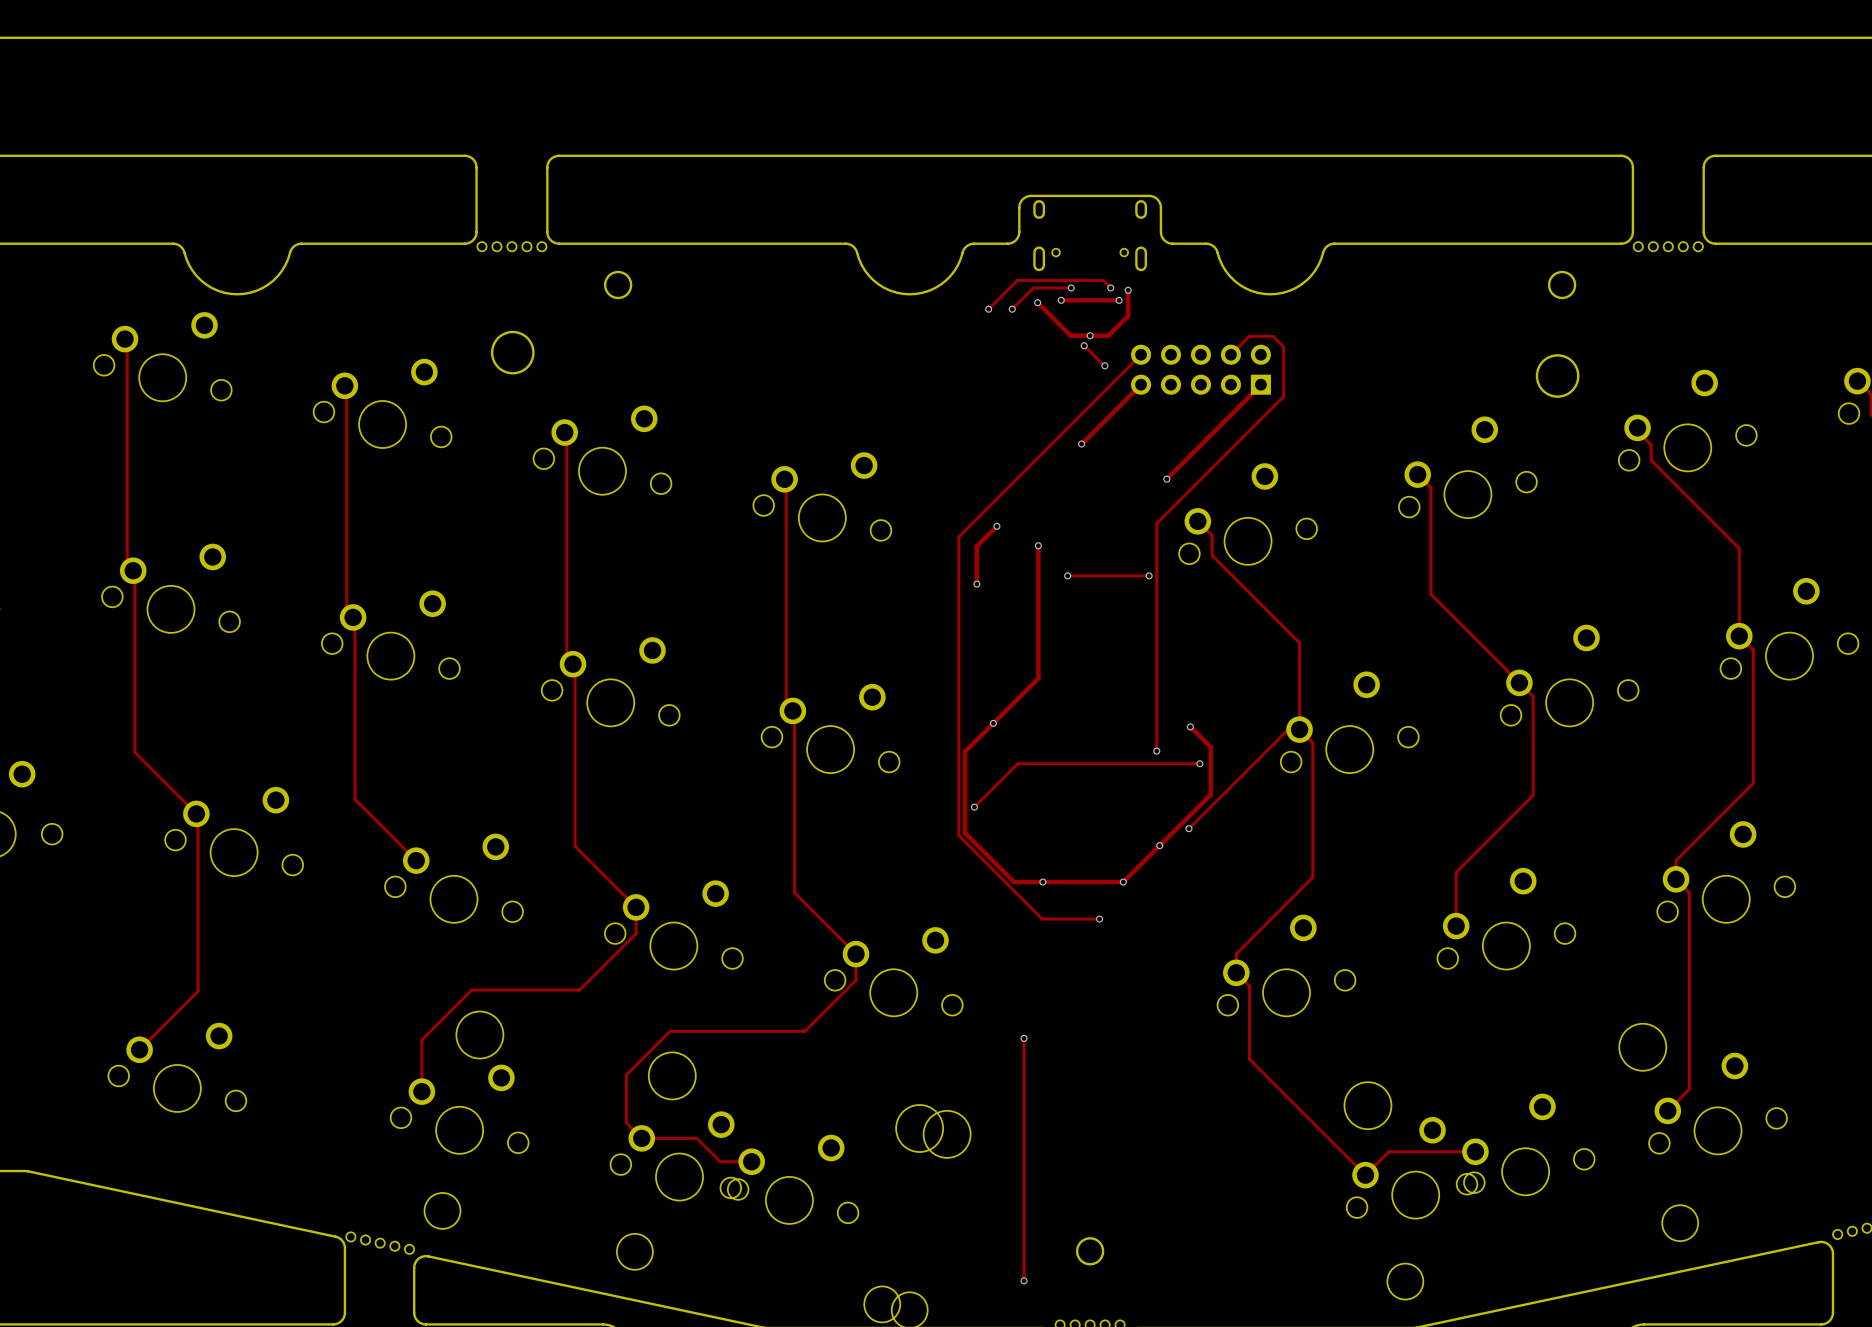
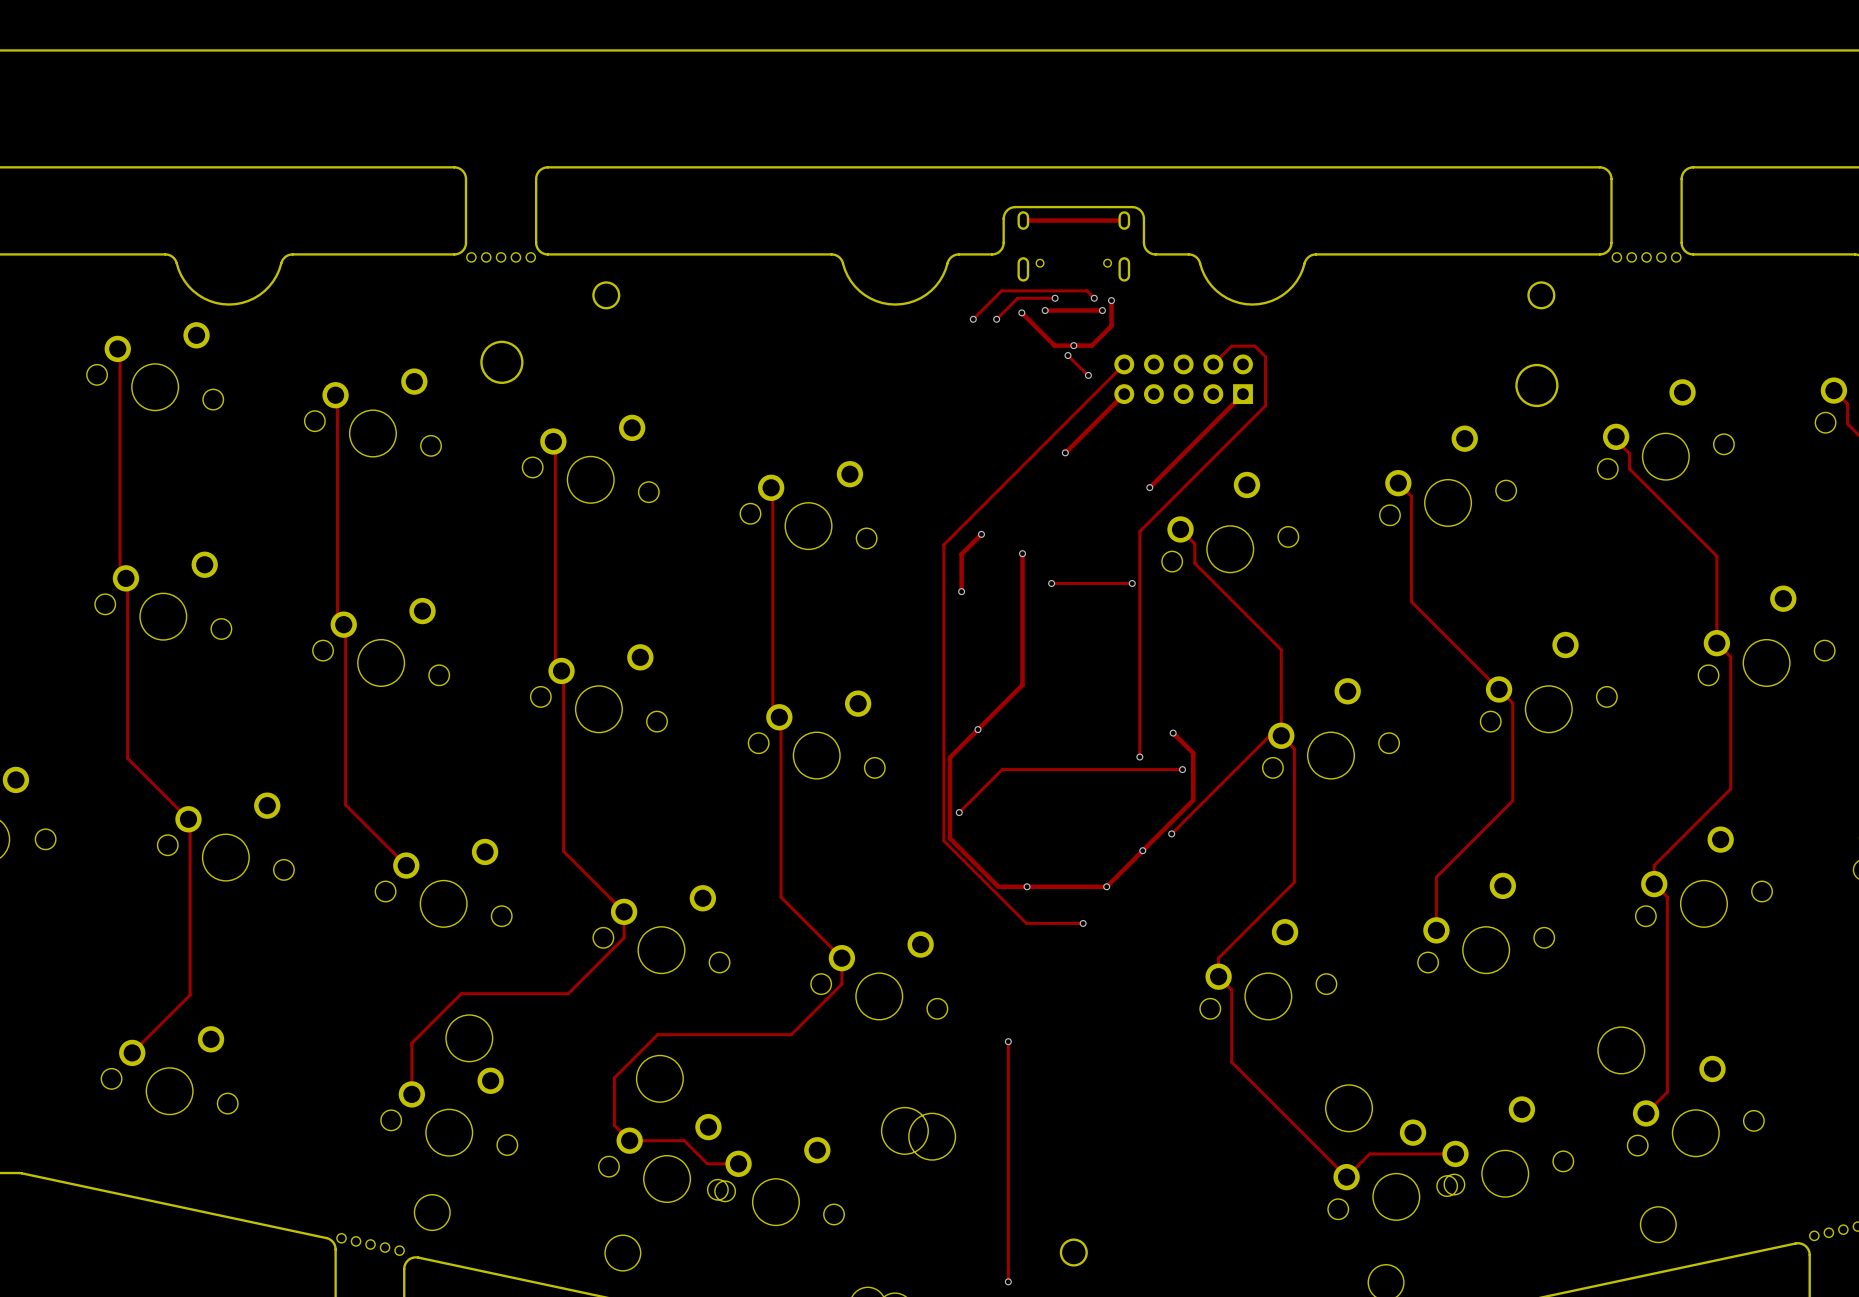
track: none -> (1023, 220) (1124, 220)

